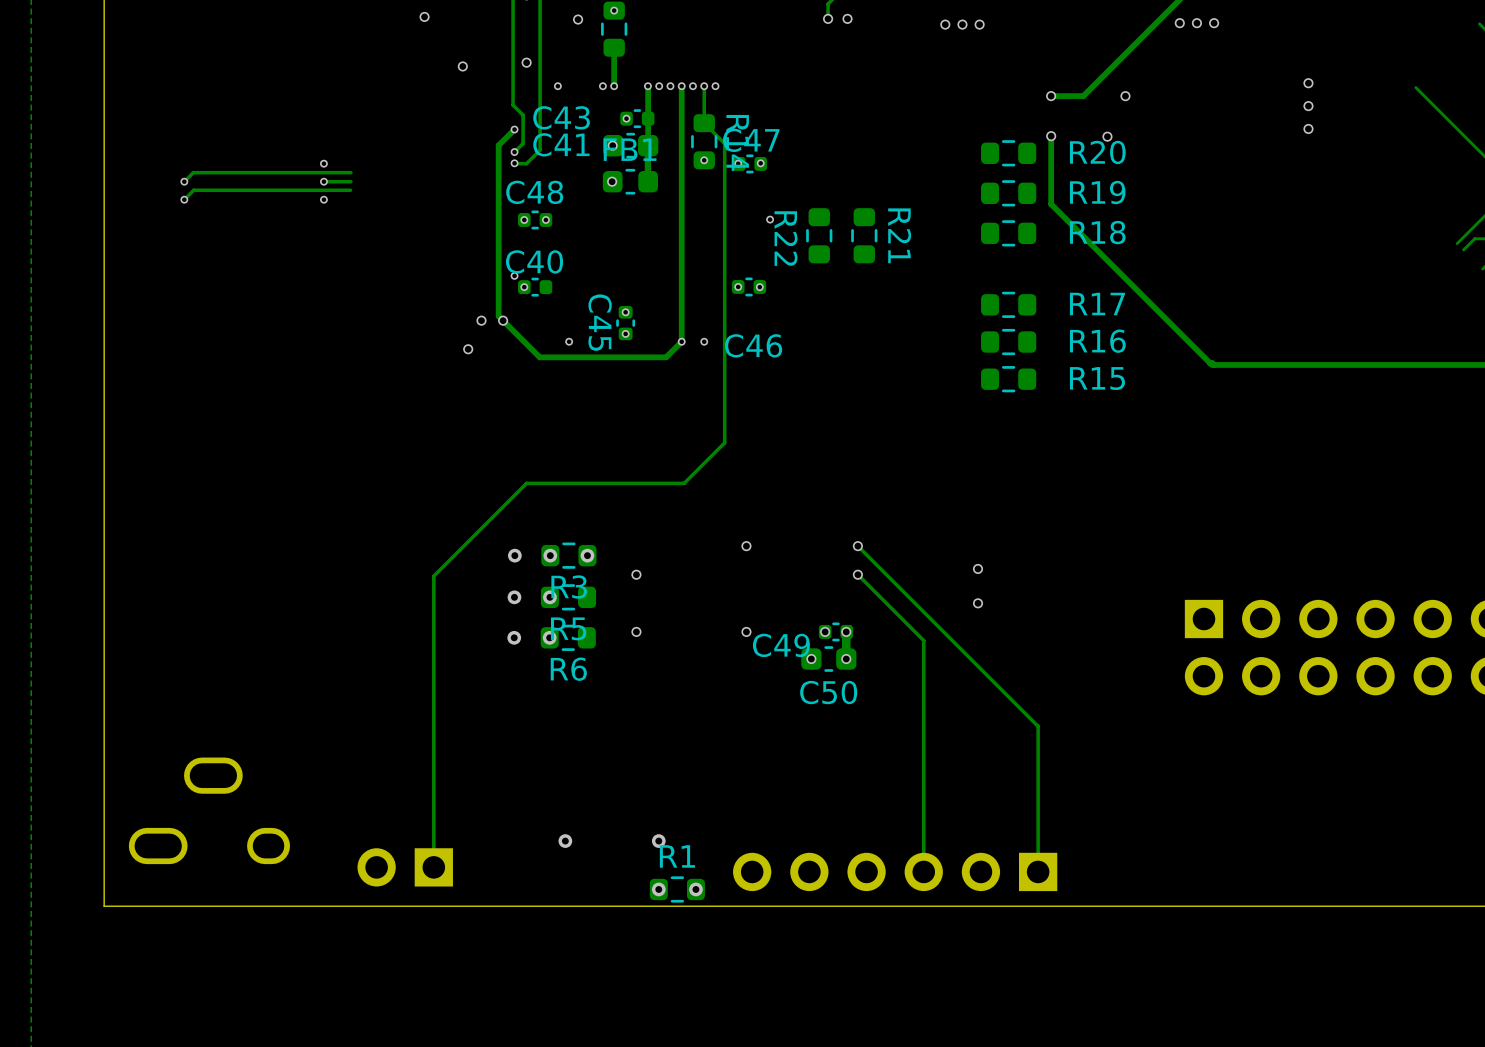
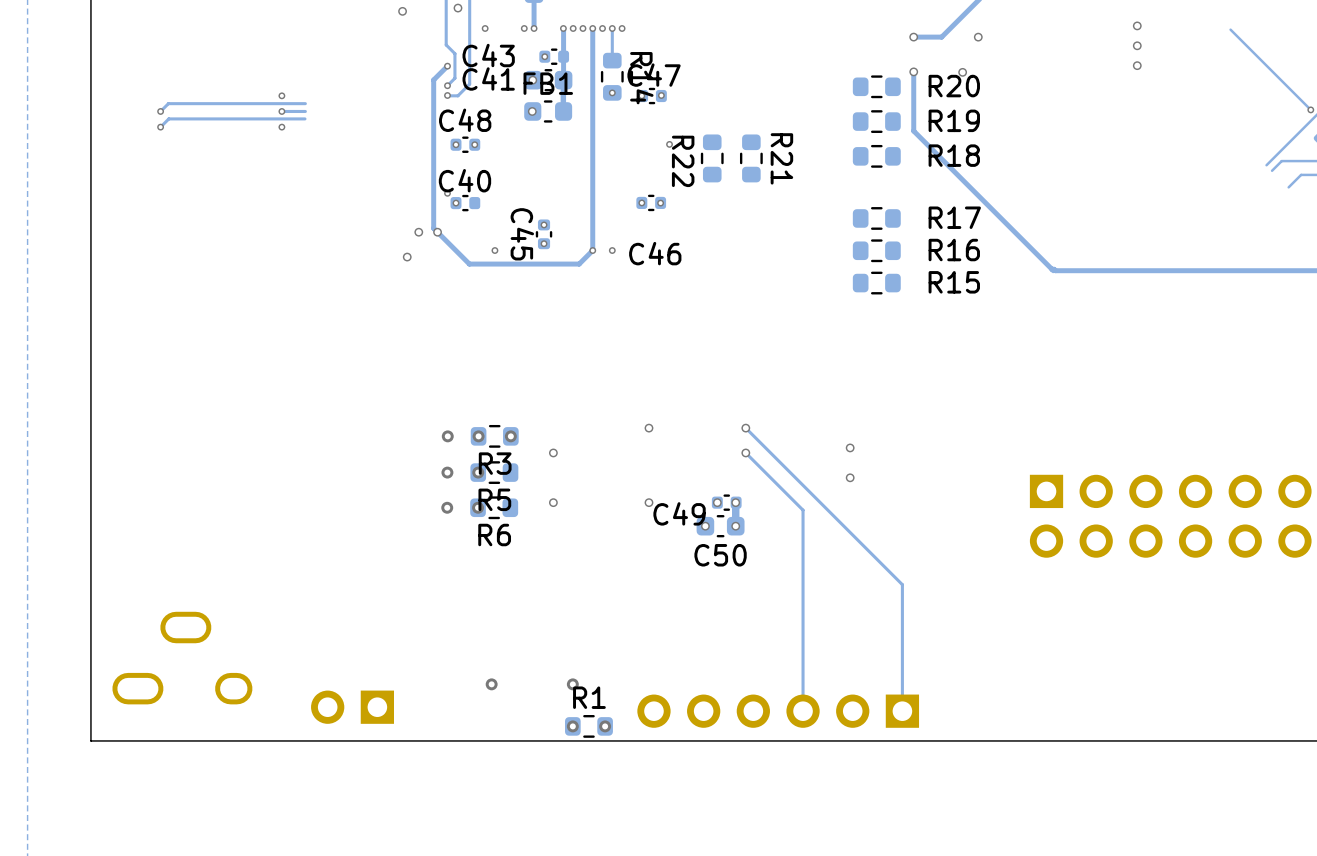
track: (704, 123) (724, 143) (724, 442) (684, 483) (526, 483) (433, 576) (433, 867) -> none

